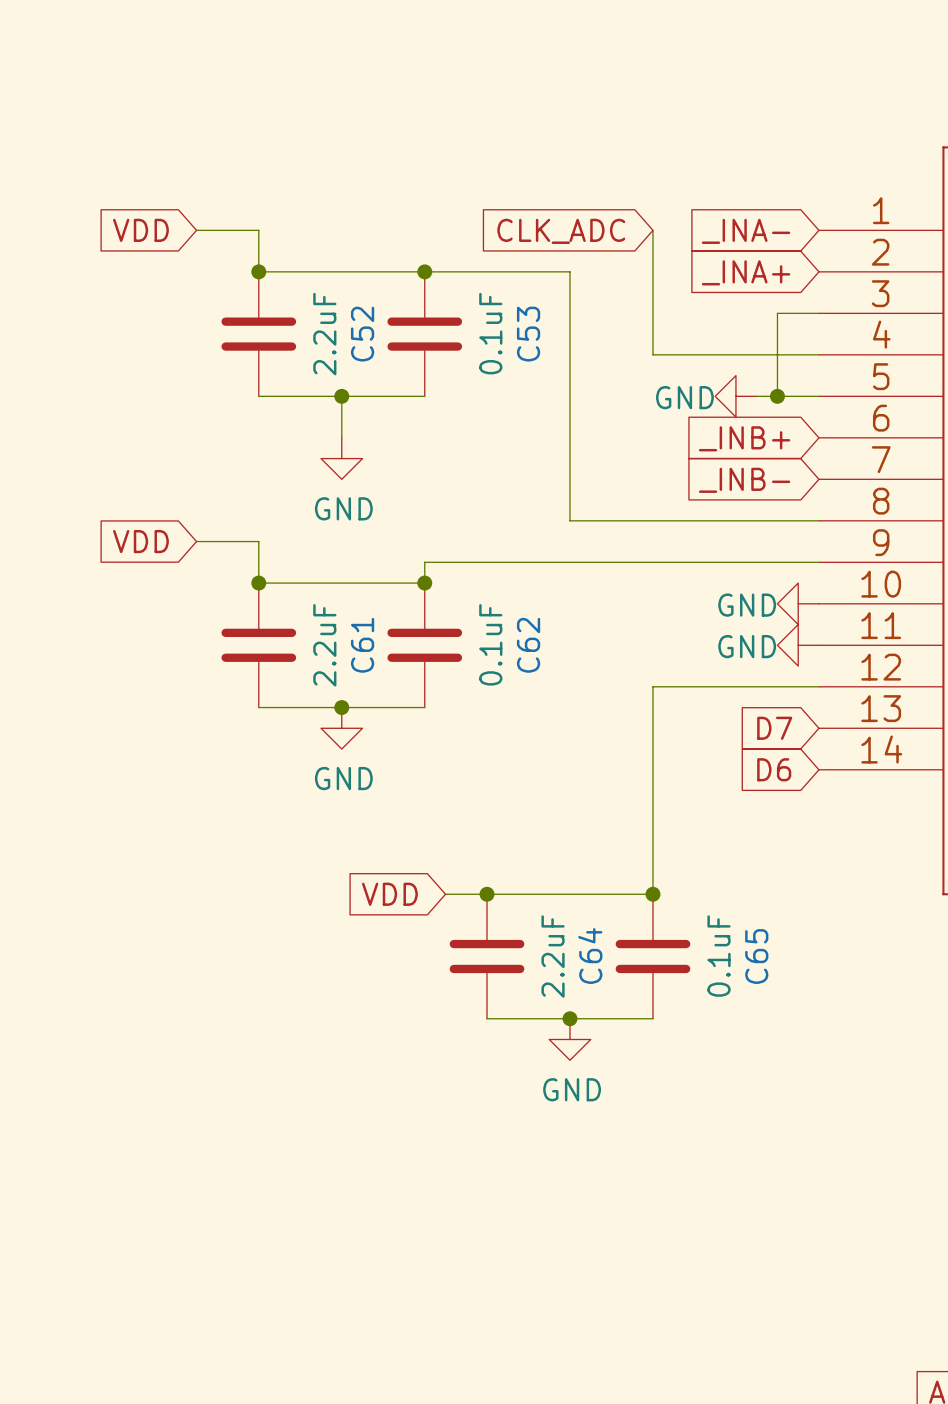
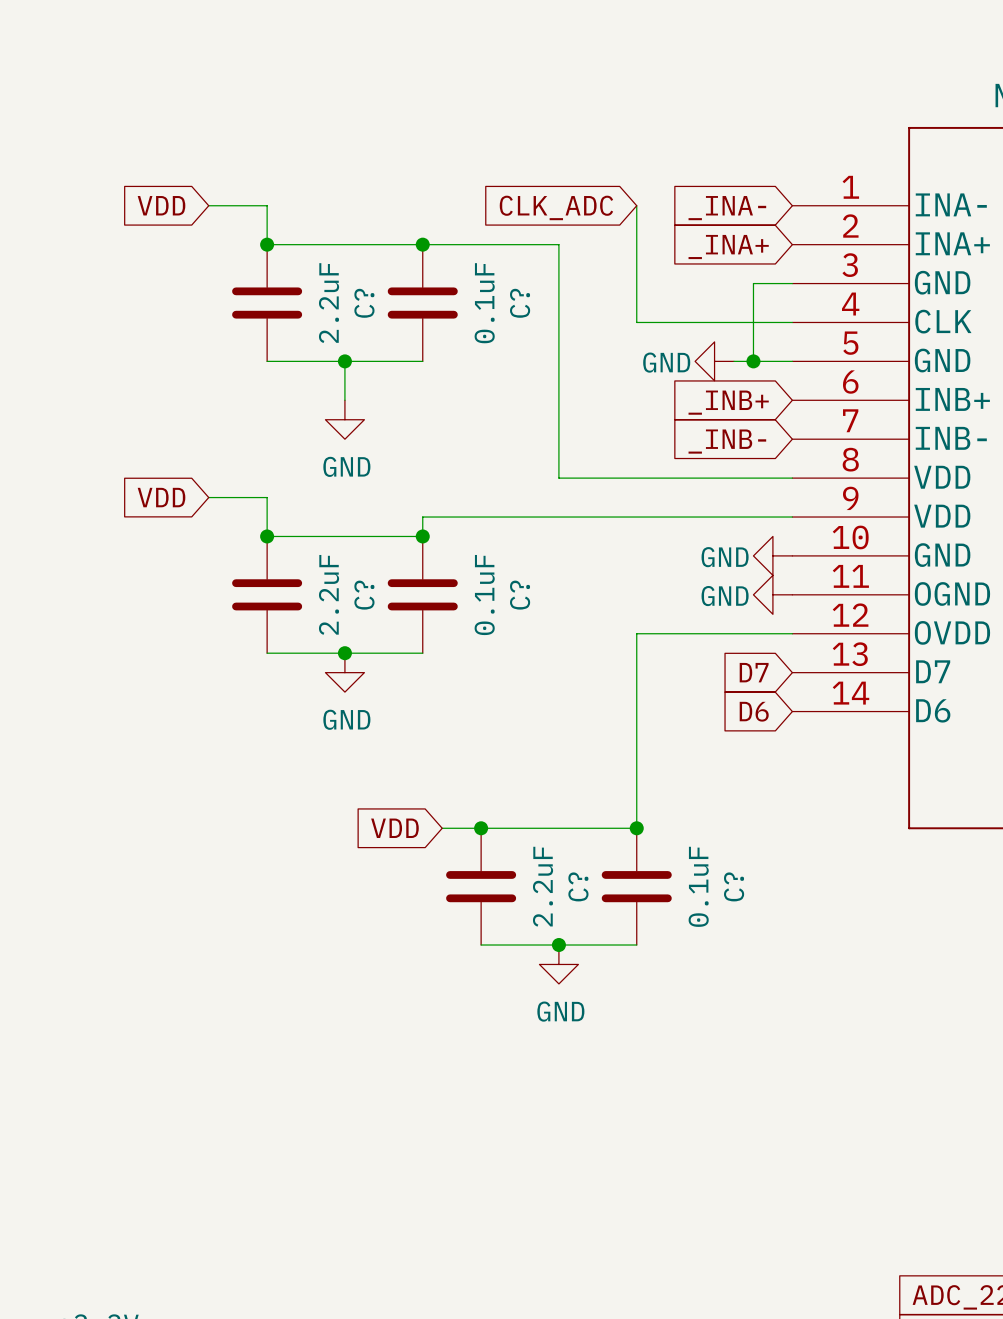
C52 name: C52 (362, 334) -> C? (364, 303)
C53 name: C53 (528, 334) -> C? (520, 303)
C61 name: C61 (362, 645) -> C? (364, 595)
C62 name: C62 (528, 645) -> C? (520, 595)
C64 name: C64 (590, 956) -> C? (578, 886)
C65 name: C65 (756, 956) -> C? (734, 886)

